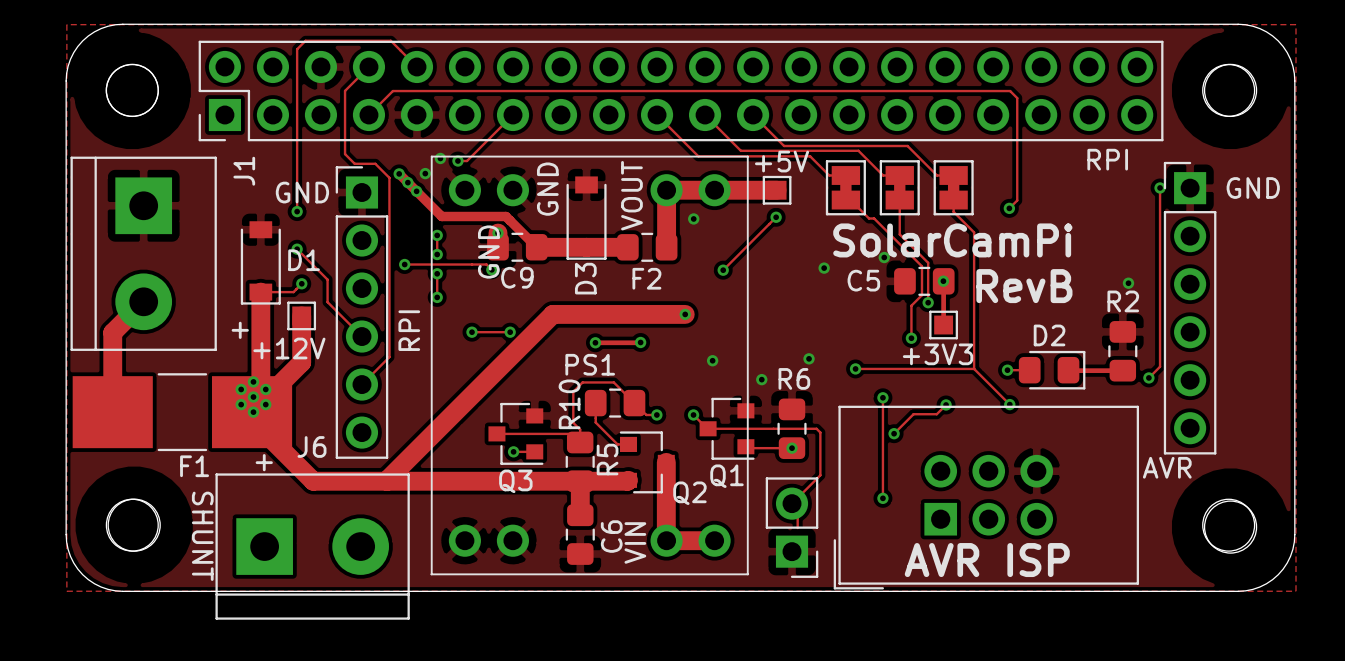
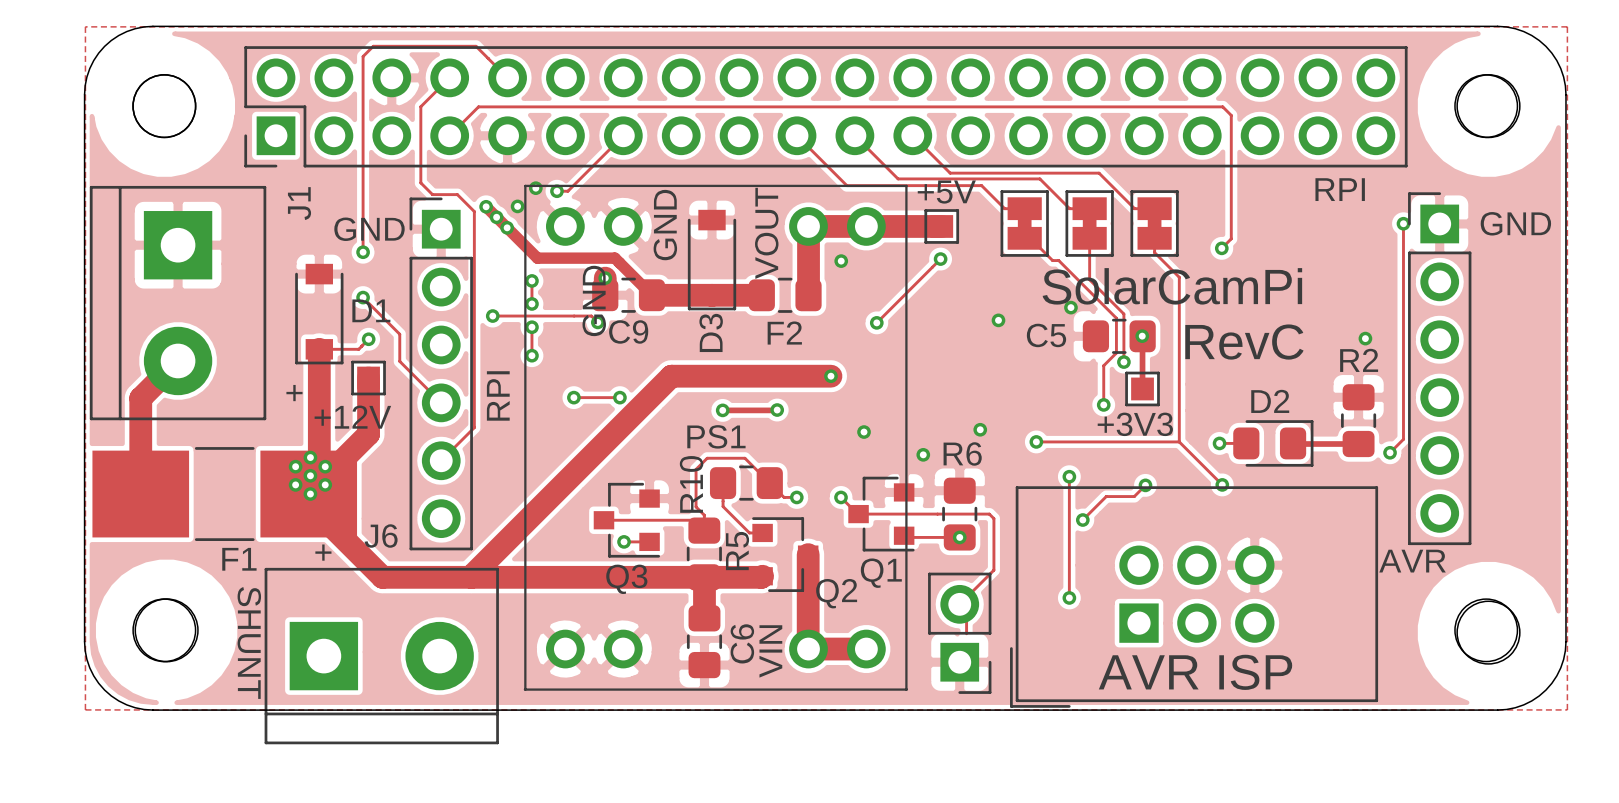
text: RevB (1024, 286) -> RevC (1244, 342)

